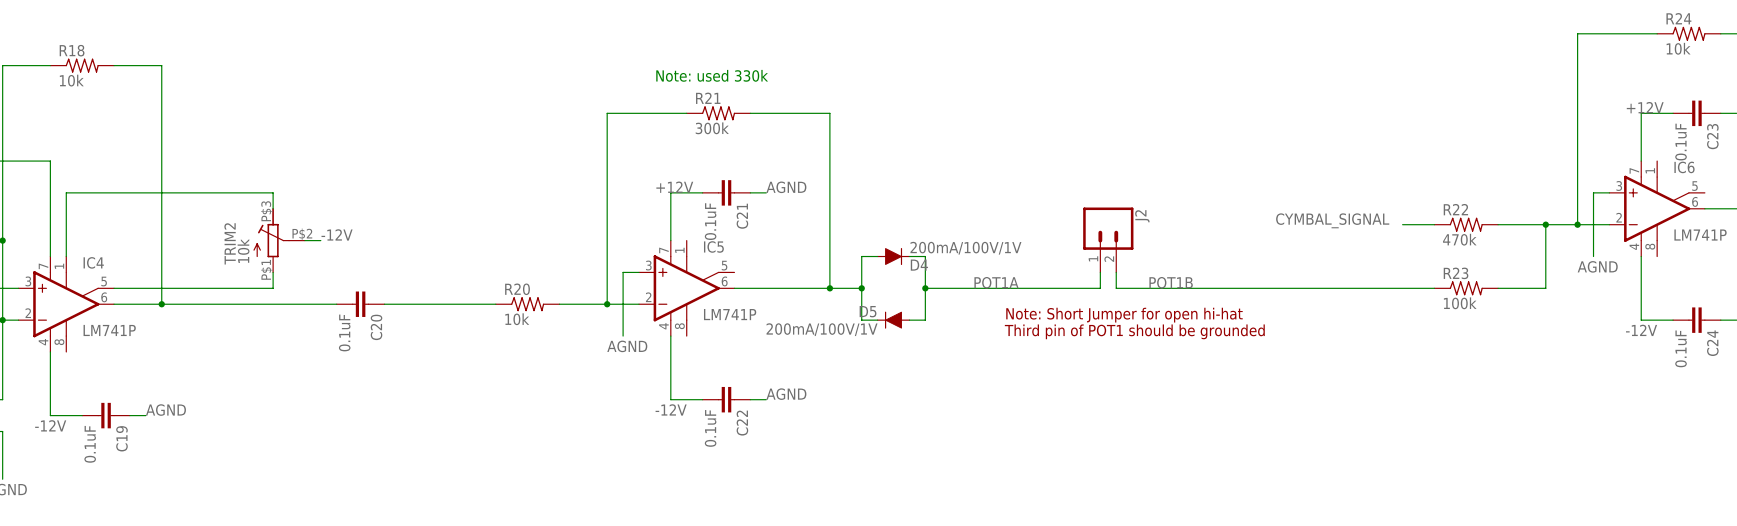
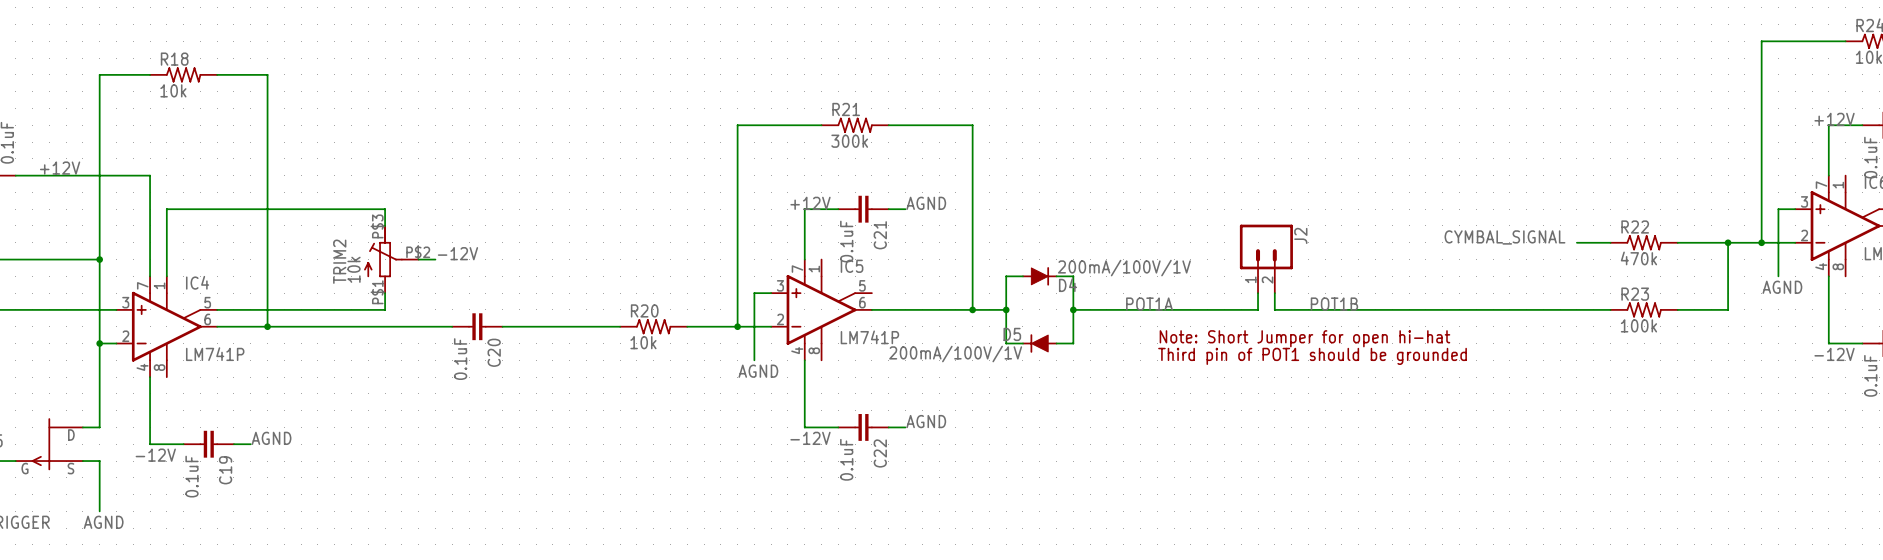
text: Note: used 330k (712, 75) -> none

